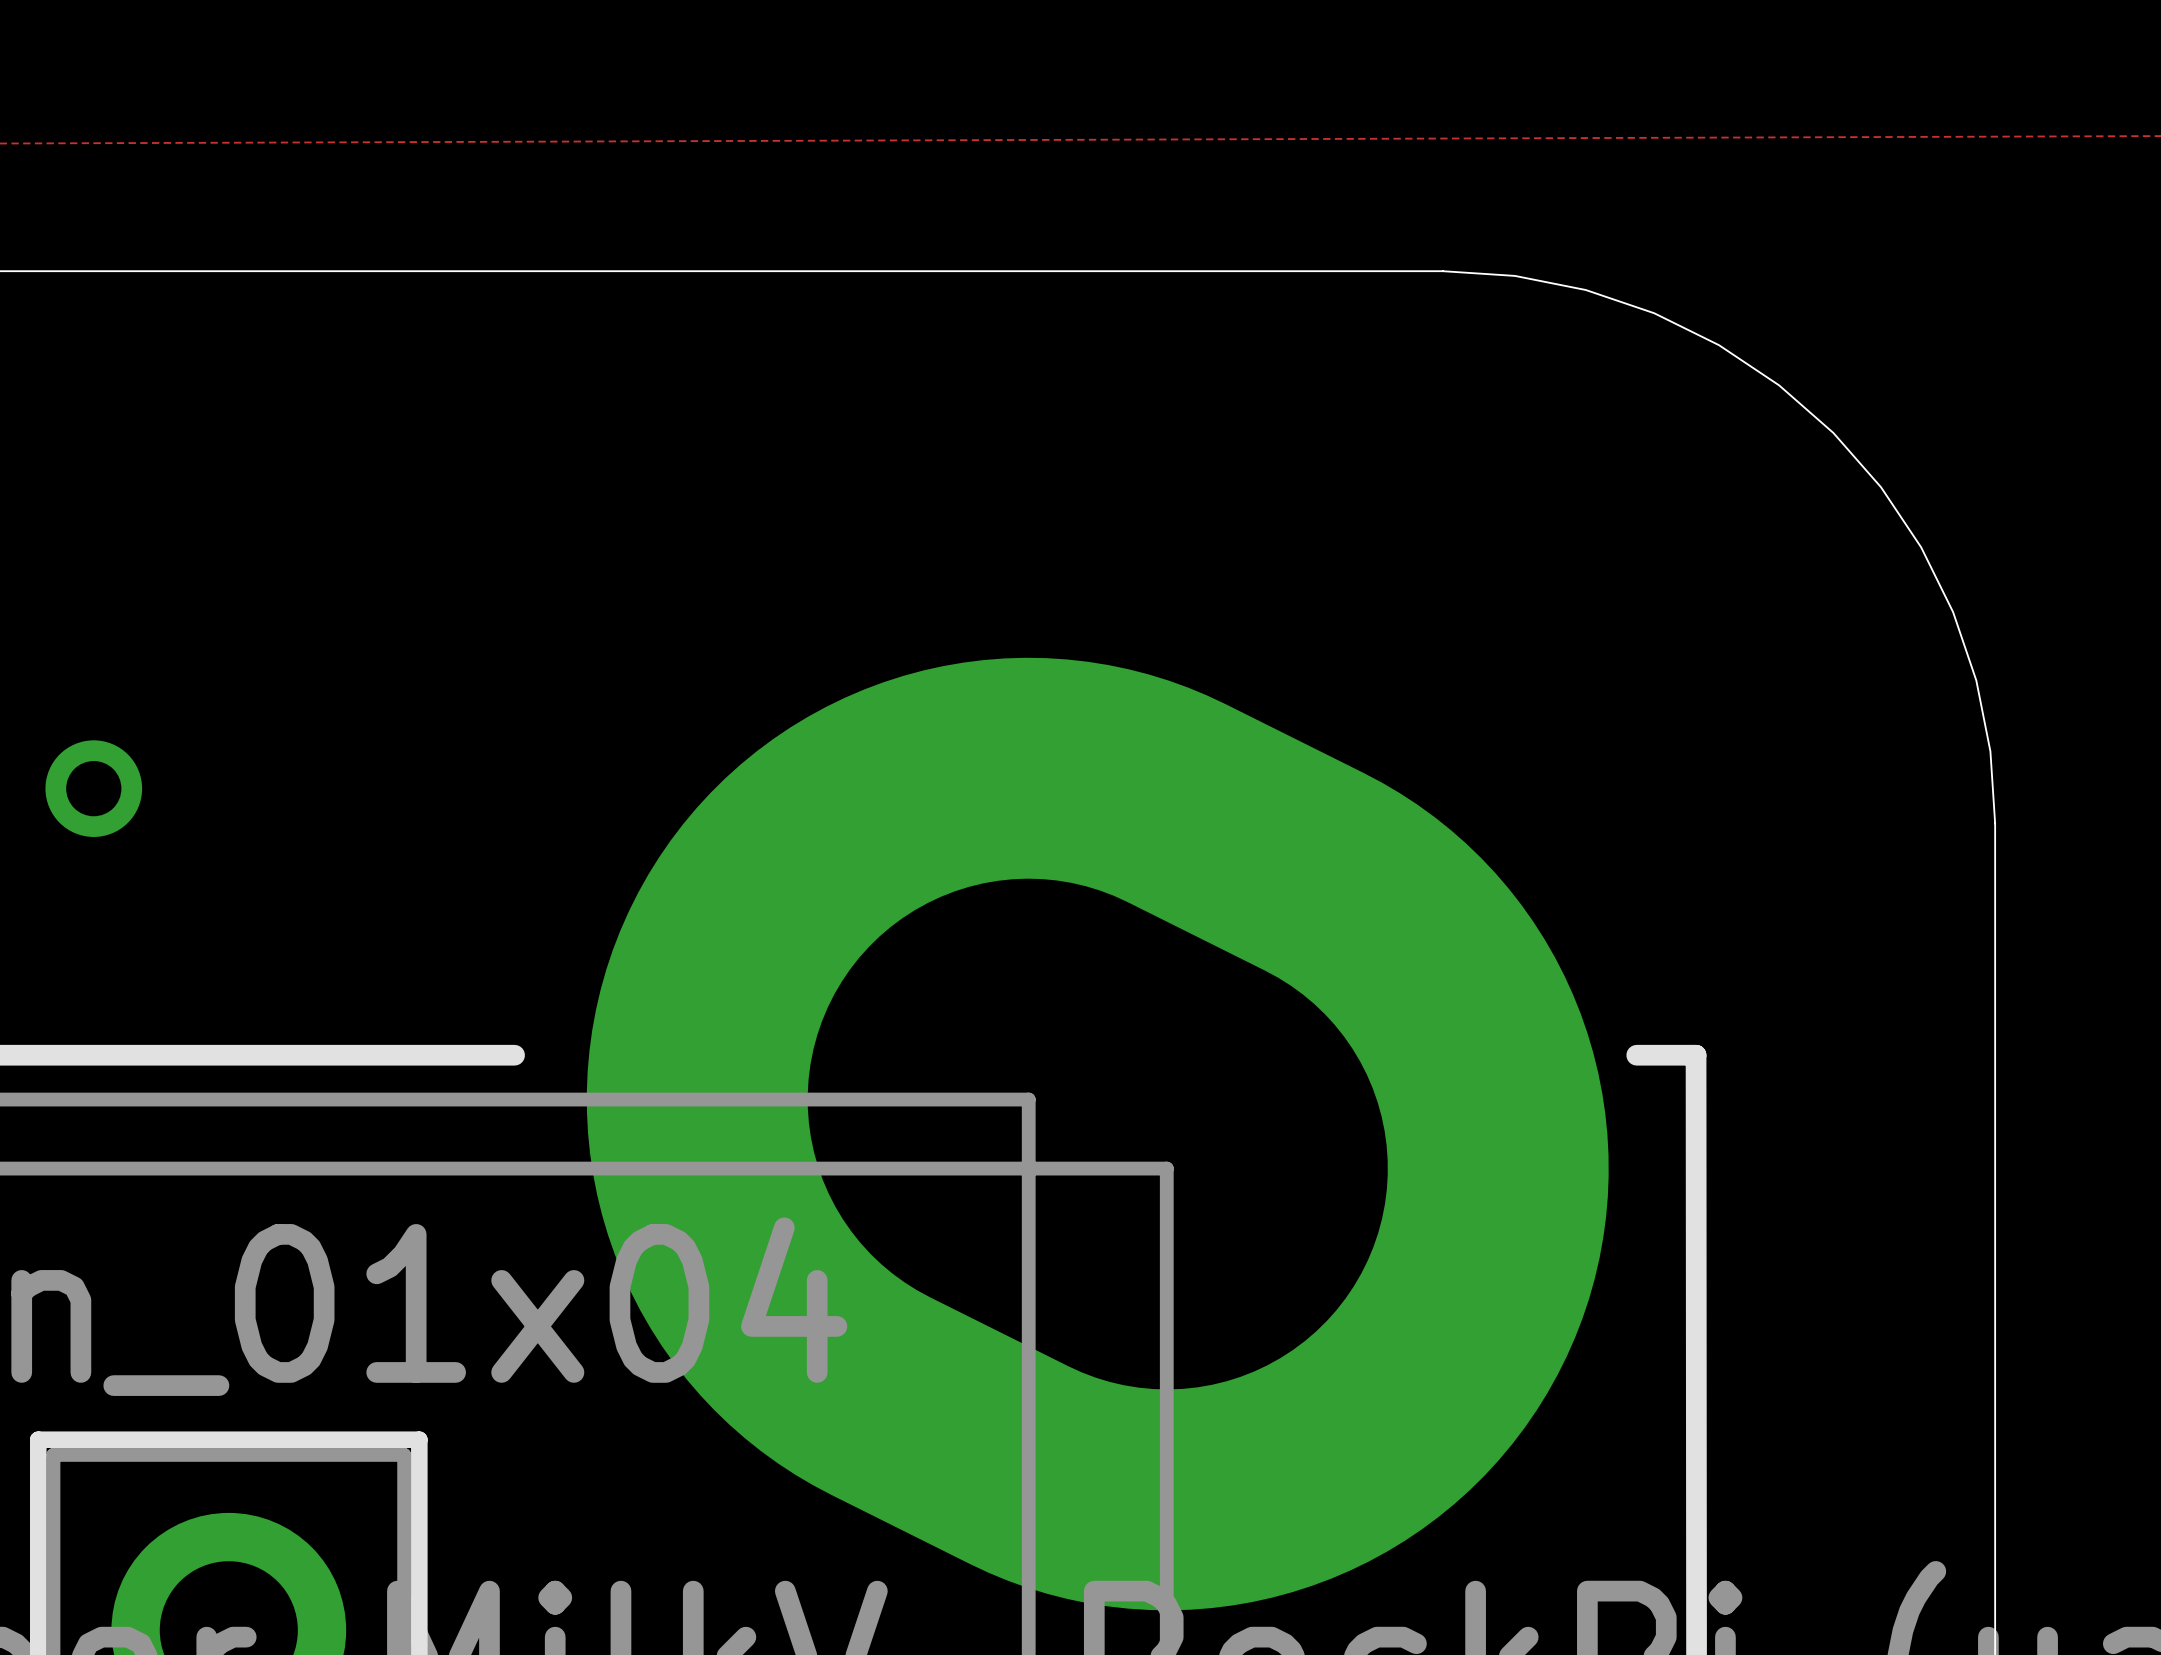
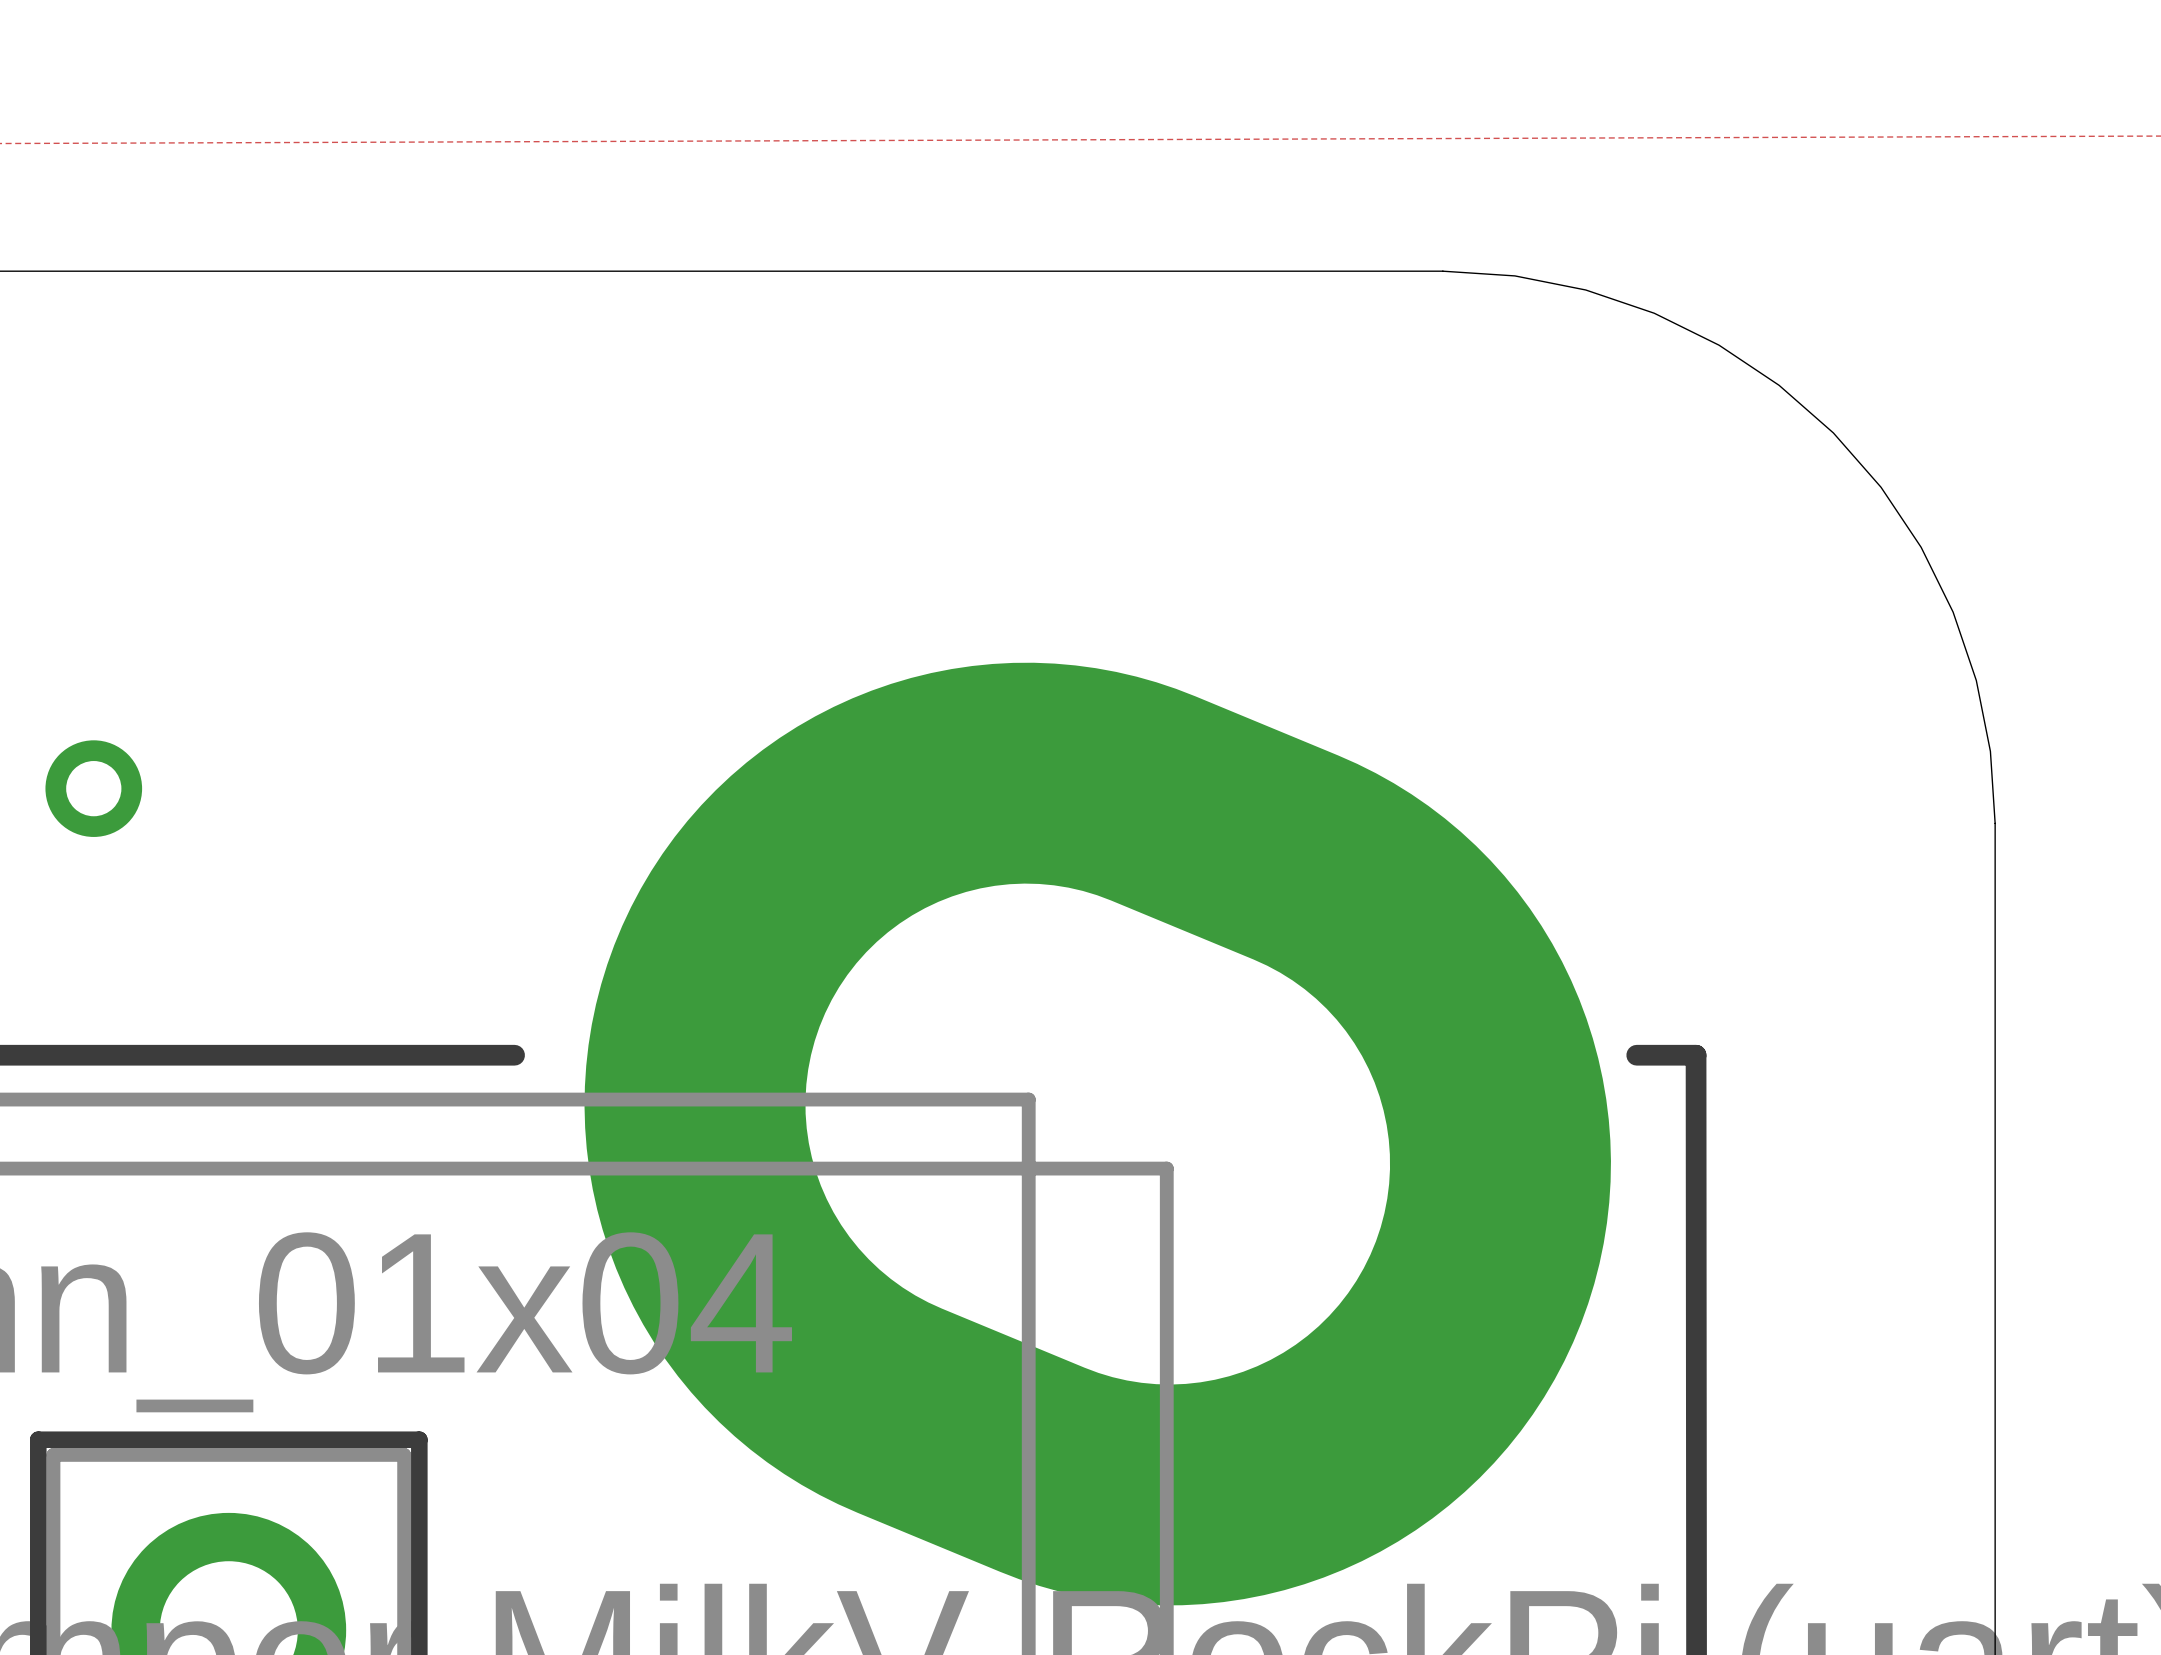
part footprint: [586, 657, 1609, 1611] -> [584, 662, 1611, 1606]

